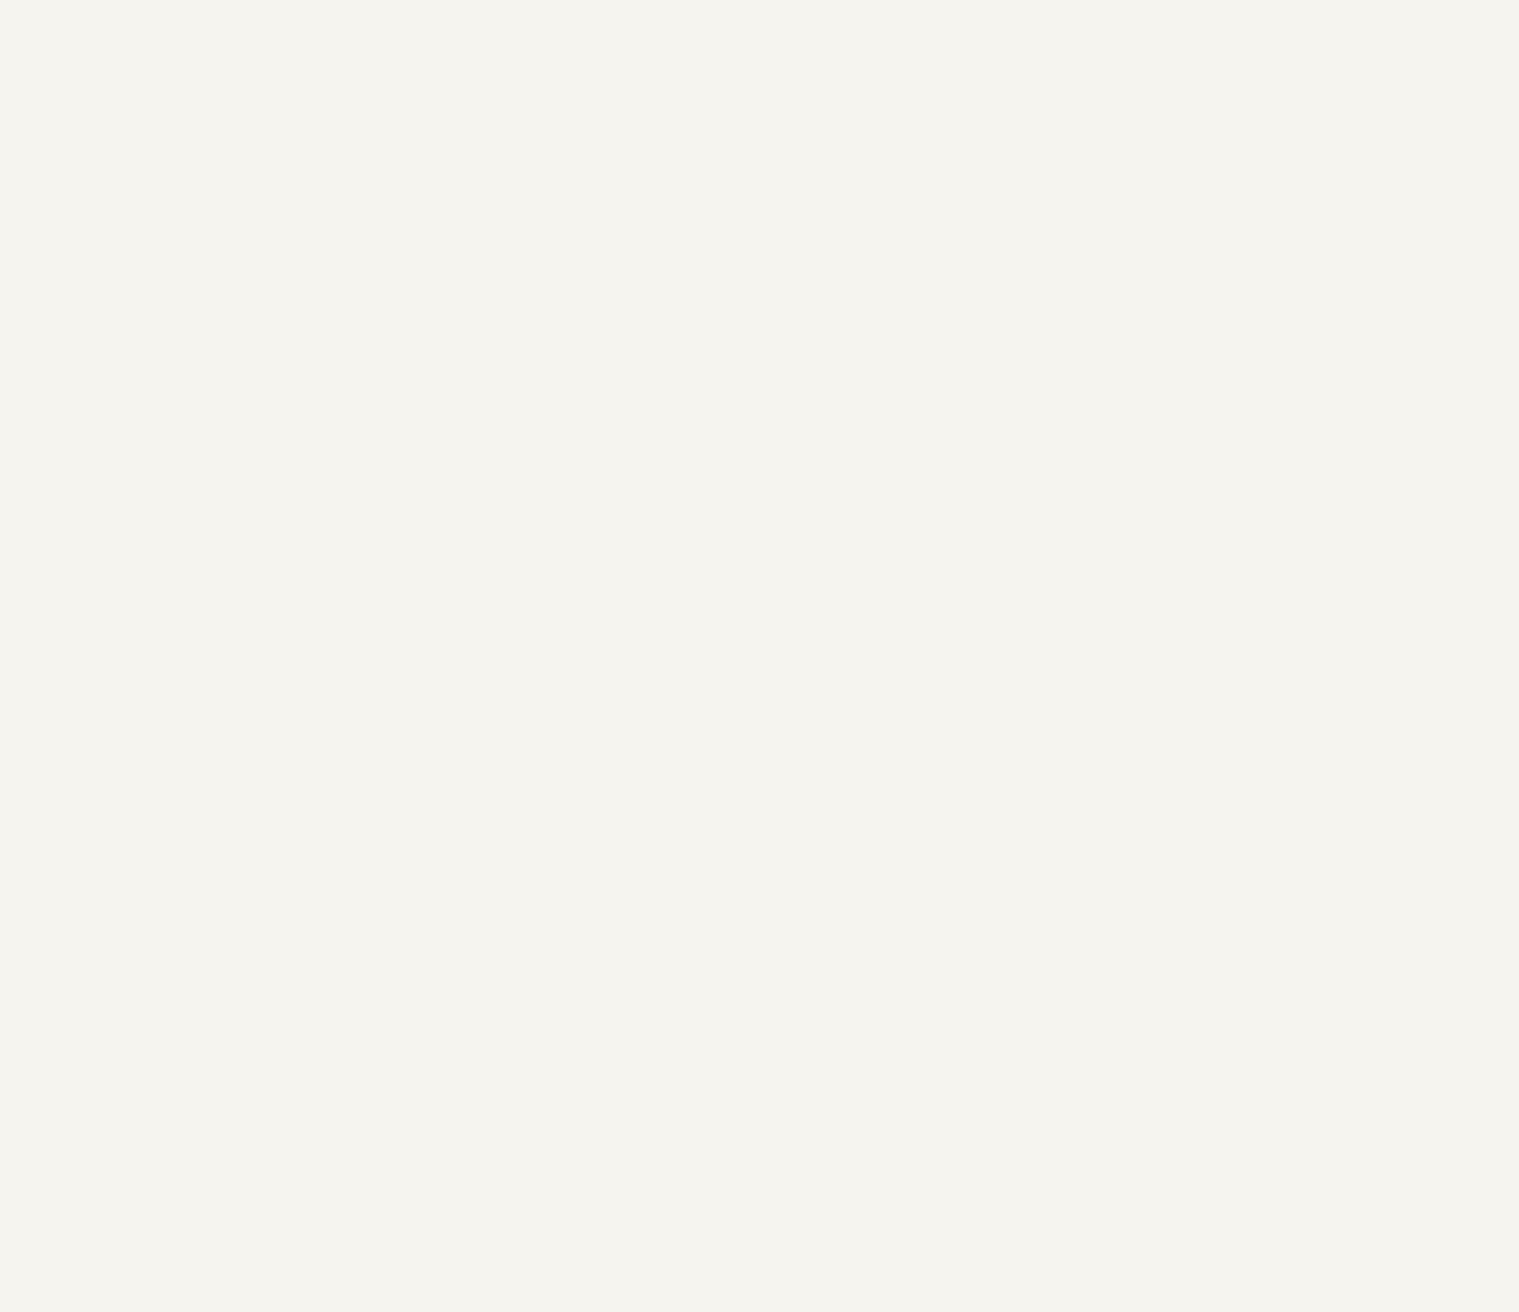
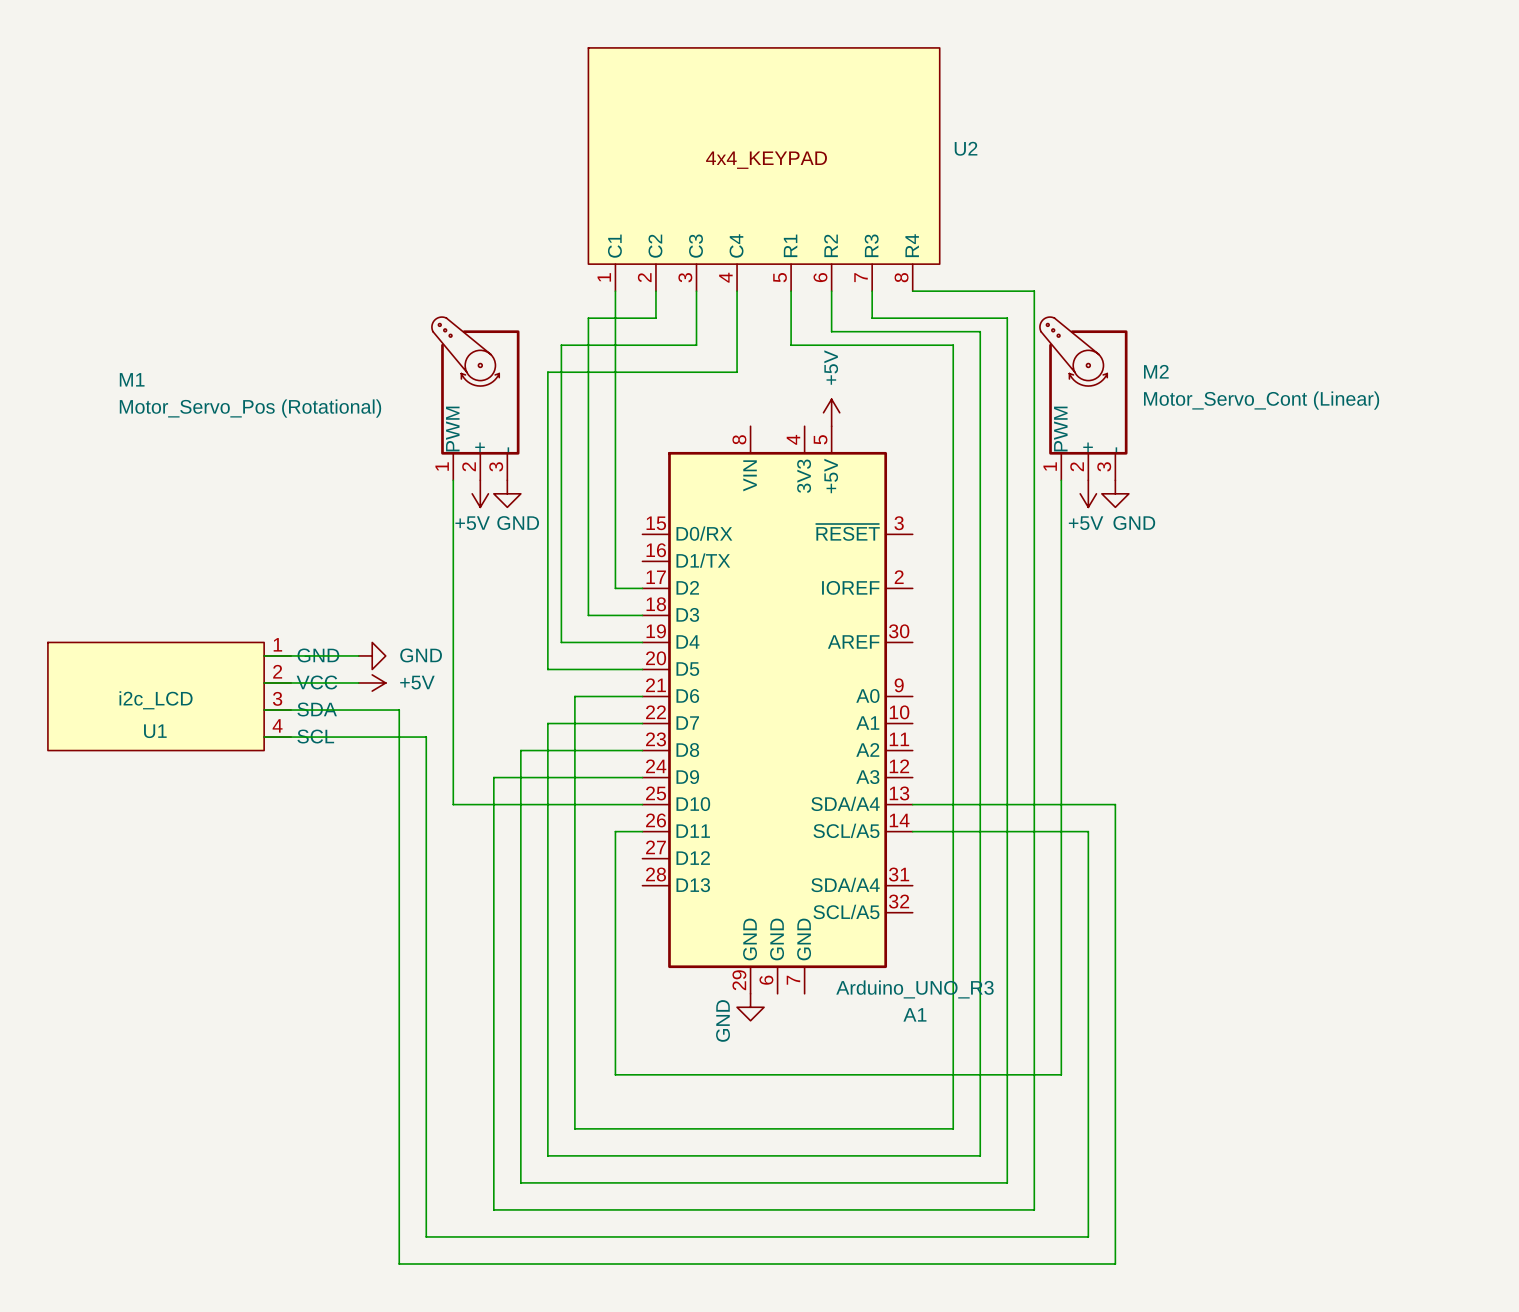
U2: none -> (764, 169)
wire: none -> (615, 291) (615, 588) (642, 588)
wire: none -> (655, 291) (655, 318) (588, 318) (588, 615) (642, 615)
wire: none -> (696, 291) (696, 345) (561, 345) (561, 642) (642, 642)
wire: none -> (737, 291) (737, 372) (547, 372) (547, 669) (642, 669)
wire: none -> (791, 291) (791, 345) (953, 345) (953, 1128) (574, 1128) (574, 696) (642, 696)
wire: none -> (831, 291) (831, 331) (980, 331) (980, 1155) (547, 1155) (547, 723) (642, 723)
wire: none -> (872, 291) (872, 318) (1007, 318) (1007, 1182) (520, 1182) (520, 750) (642, 750)
wire: none -> (912, 291) (1034, 291) (1034, 1209) (493, 1209) (493, 777) (642, 777)
M1: none -> Motor_Servo_Pos (Rotational) (475, 398)
M2: none -> Motor_Servo_Cont (Linear) (1083, 398)
power symbol: none -> +5V (831, 412)
wire: none -> (453, 480) (453, 804) (642, 804)
wire: none -> (1061, 480) (1061, 1074) (615, 1074) (615, 831) (642, 831)
power symbol: none -> +5V (480, 493)
power symbol: none -> GND (507, 493)
power symbol: none -> +5V (1088, 493)
power symbol: none -> GND (1115, 493)
wire: none -> (264, 655) (358, 655)
power symbol: none -> GND (372, 655)
wire: none -> (264, 682) (358, 682)
power symbol: none -> +5V (372, 682)
U1: none -> i2c_LCD (169, 696)
wire: none -> (264, 710) (399, 710) (399, 1264) (1115, 1264) (1115, 804) (912, 804)
A1: none -> Arduino_UNO_R3 (777, 710)
wire: none -> (264, 737) (426, 737) (426, 1236) (1088, 1236) (1088, 831) (912, 831)
power symbol: none -> GND (750, 1007)

